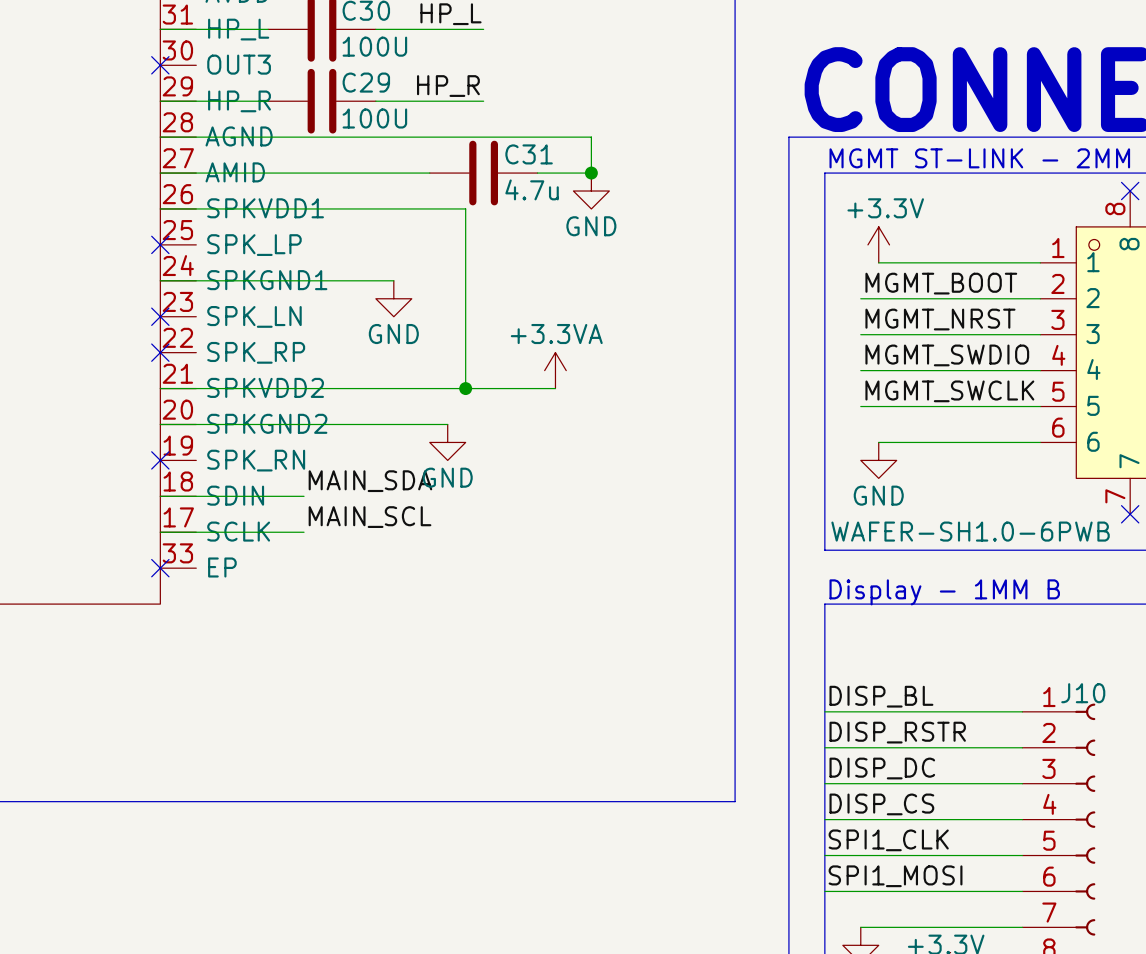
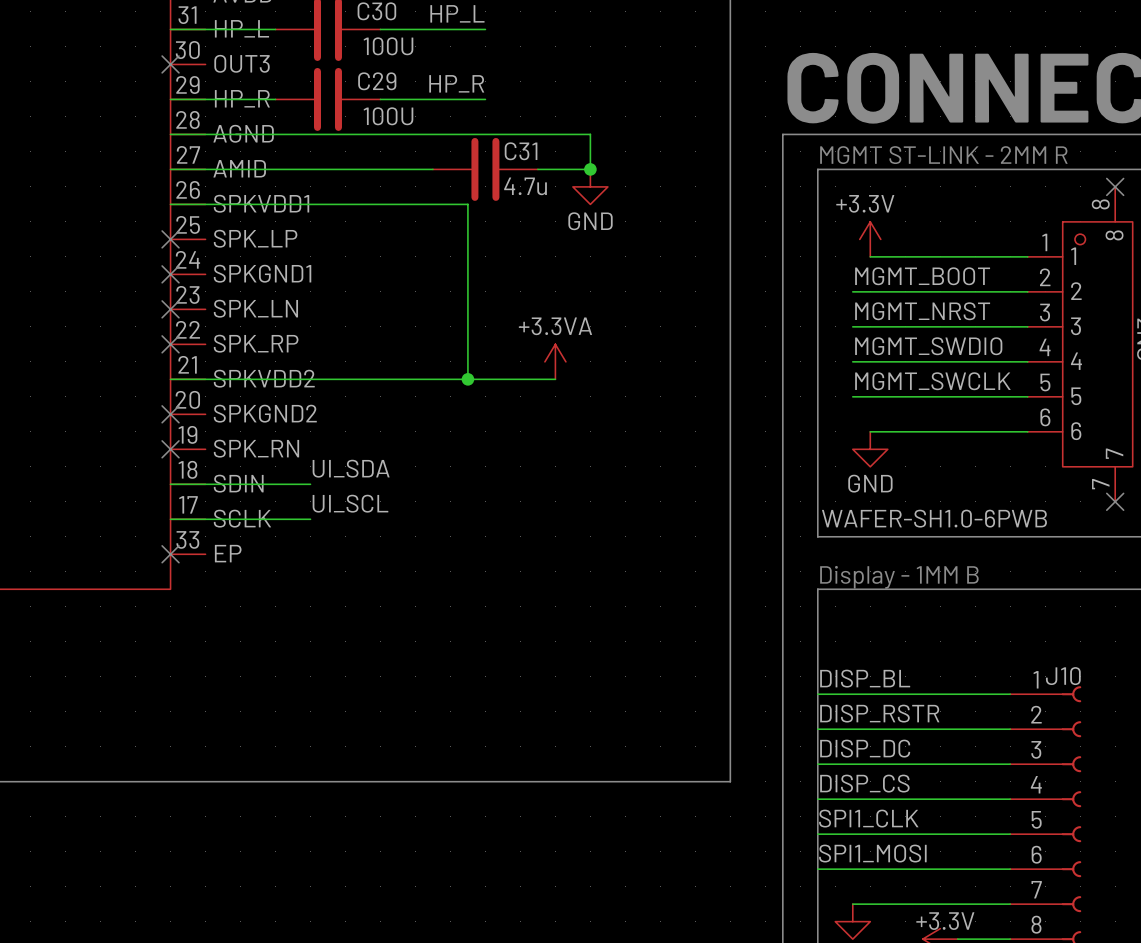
wire: (160, 280) (393, 280) -> none
no-connect mark: none -> (170, 274)
power symbol: GND (393, 298) -> none
wire: (160, 424) (447, 424) -> none
no-connect mark: none -> (170, 414)
power symbol: GND (447, 442) -> none
label: MAIN_SDA (370, 481) -> UI_SDA (351, 468)
label: MAIN_SCL (370, 517) -> UI_SCL (350, 503)

